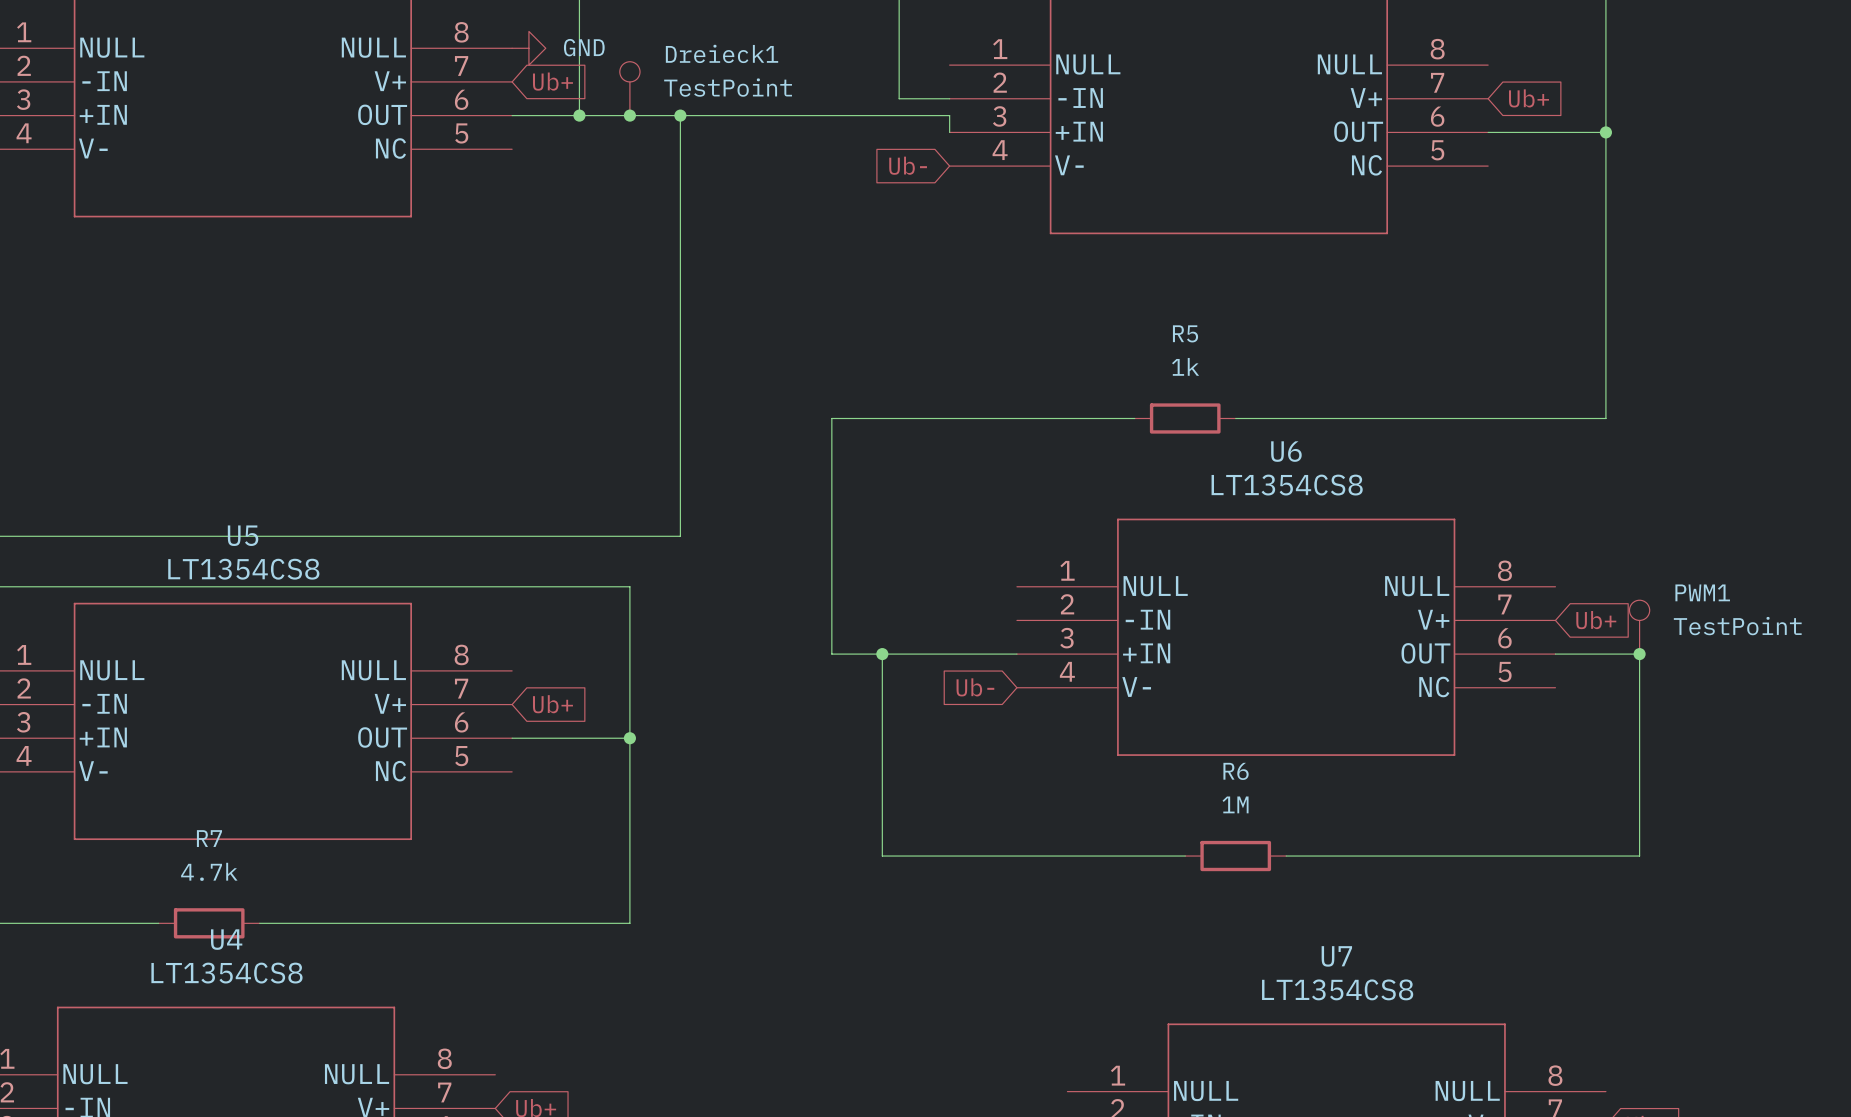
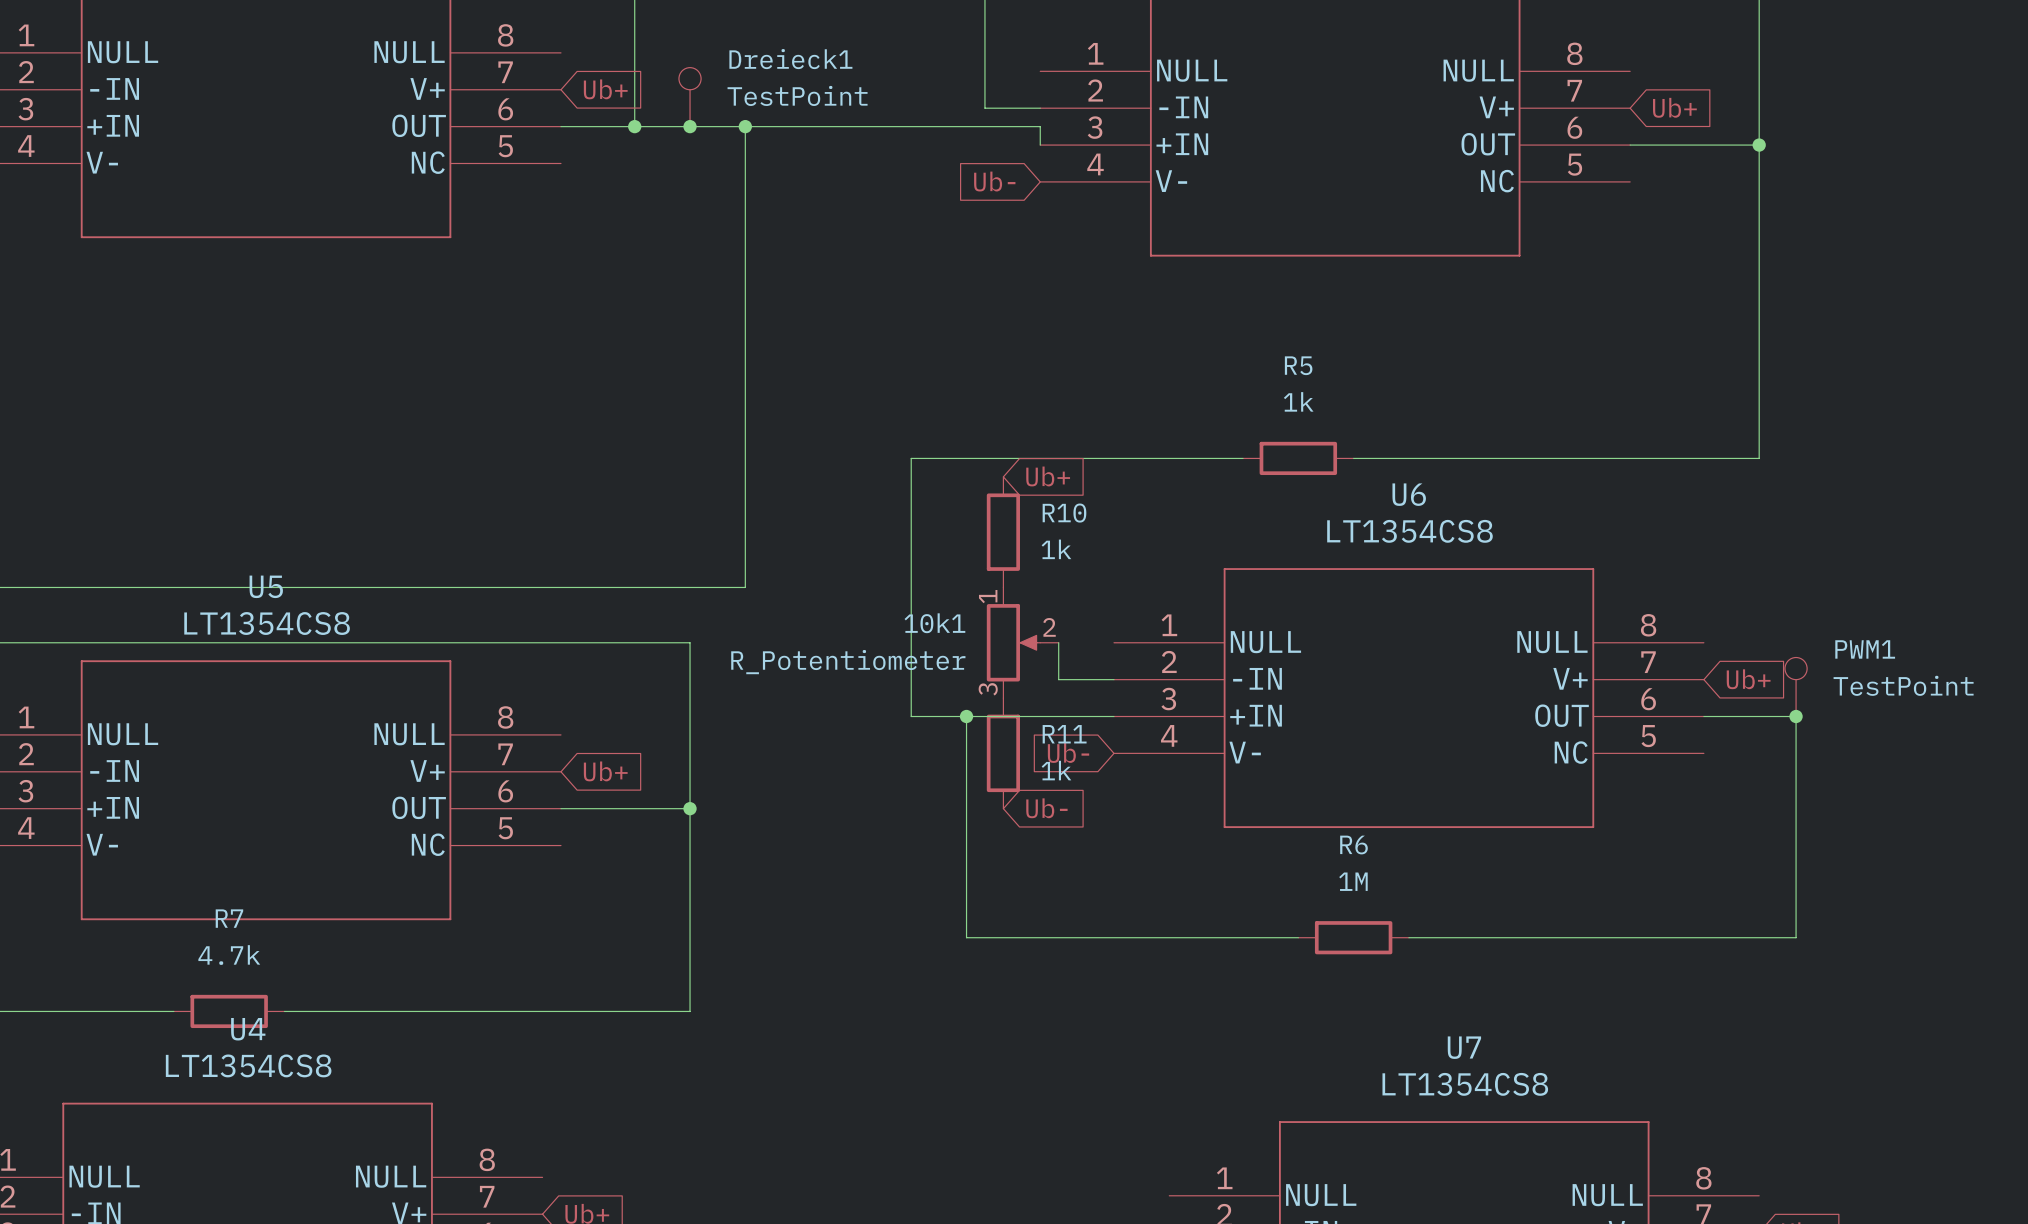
power symbol: GND (528, 48) -> none
global label: none -> Ub+ (1048, 476)
R10: none -> 1k (1003, 532)
10k1: none -> R_Potentiometer (1022, 642)
wire: none -> (1058, 642) (1058, 679) (1114, 679)
R11: none -> 1k (1003, 753)
global label: none -> Ub- (1046, 808)

